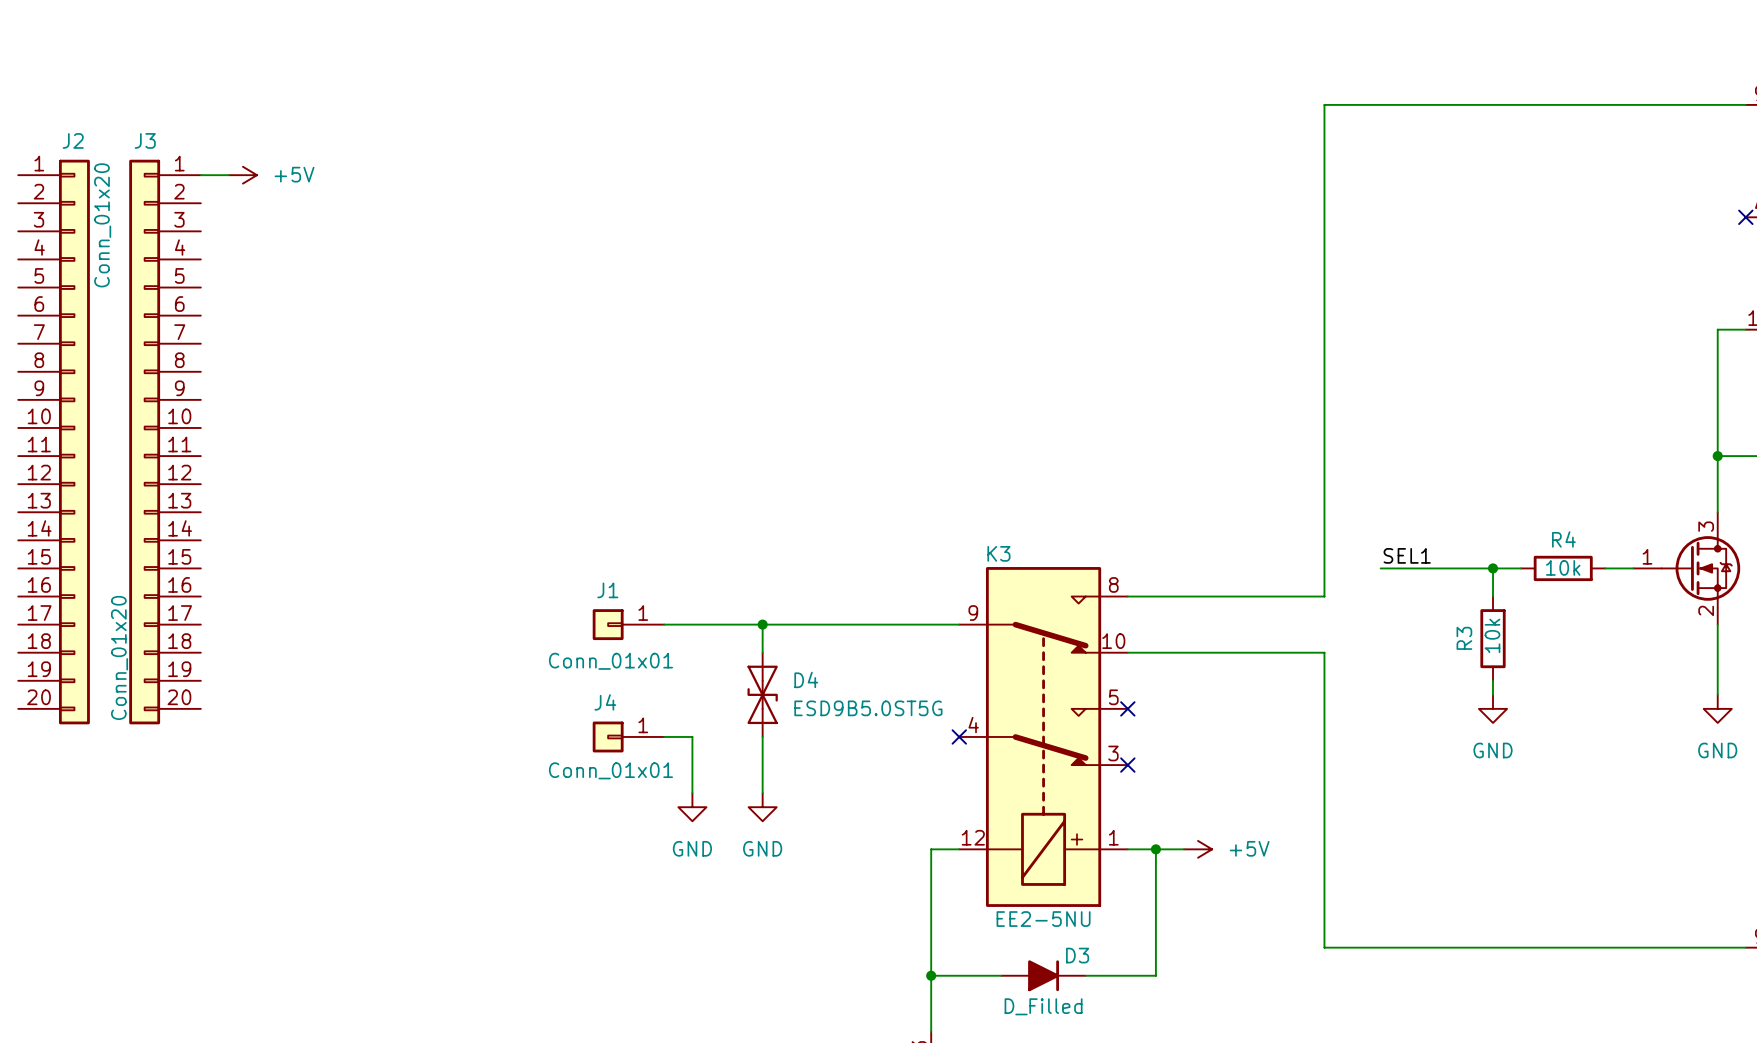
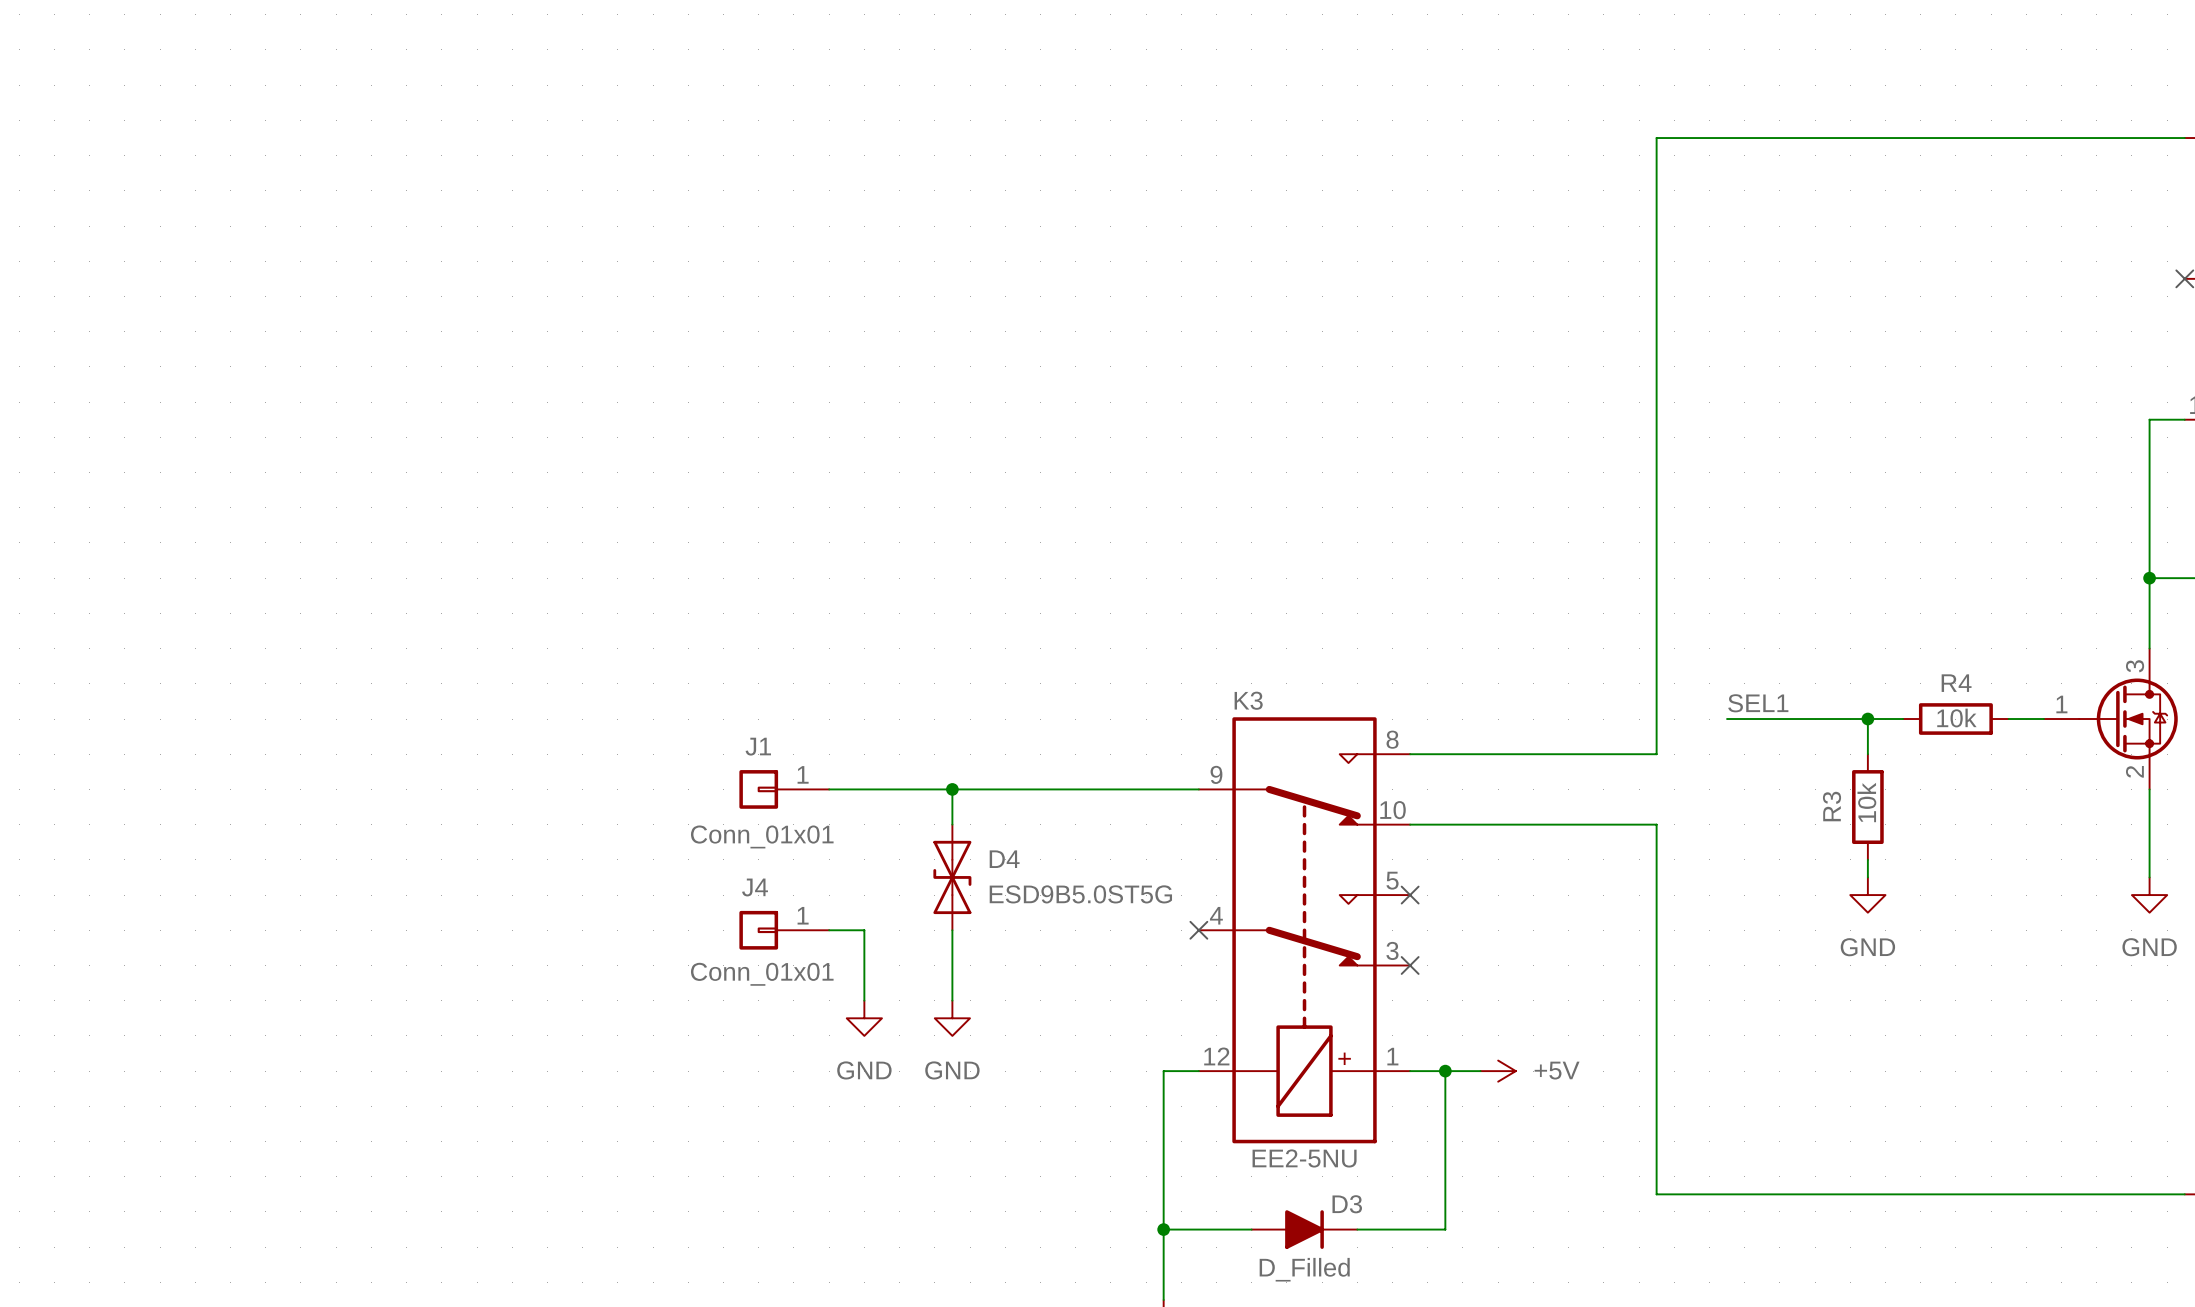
wire: (200, 175) (228, 175) -> none
power symbol: +5V (242, 175) -> none
J2: Conn_01x20 (54, 442) -> none
J3: Conn_01x20 (165, 442) -> none

